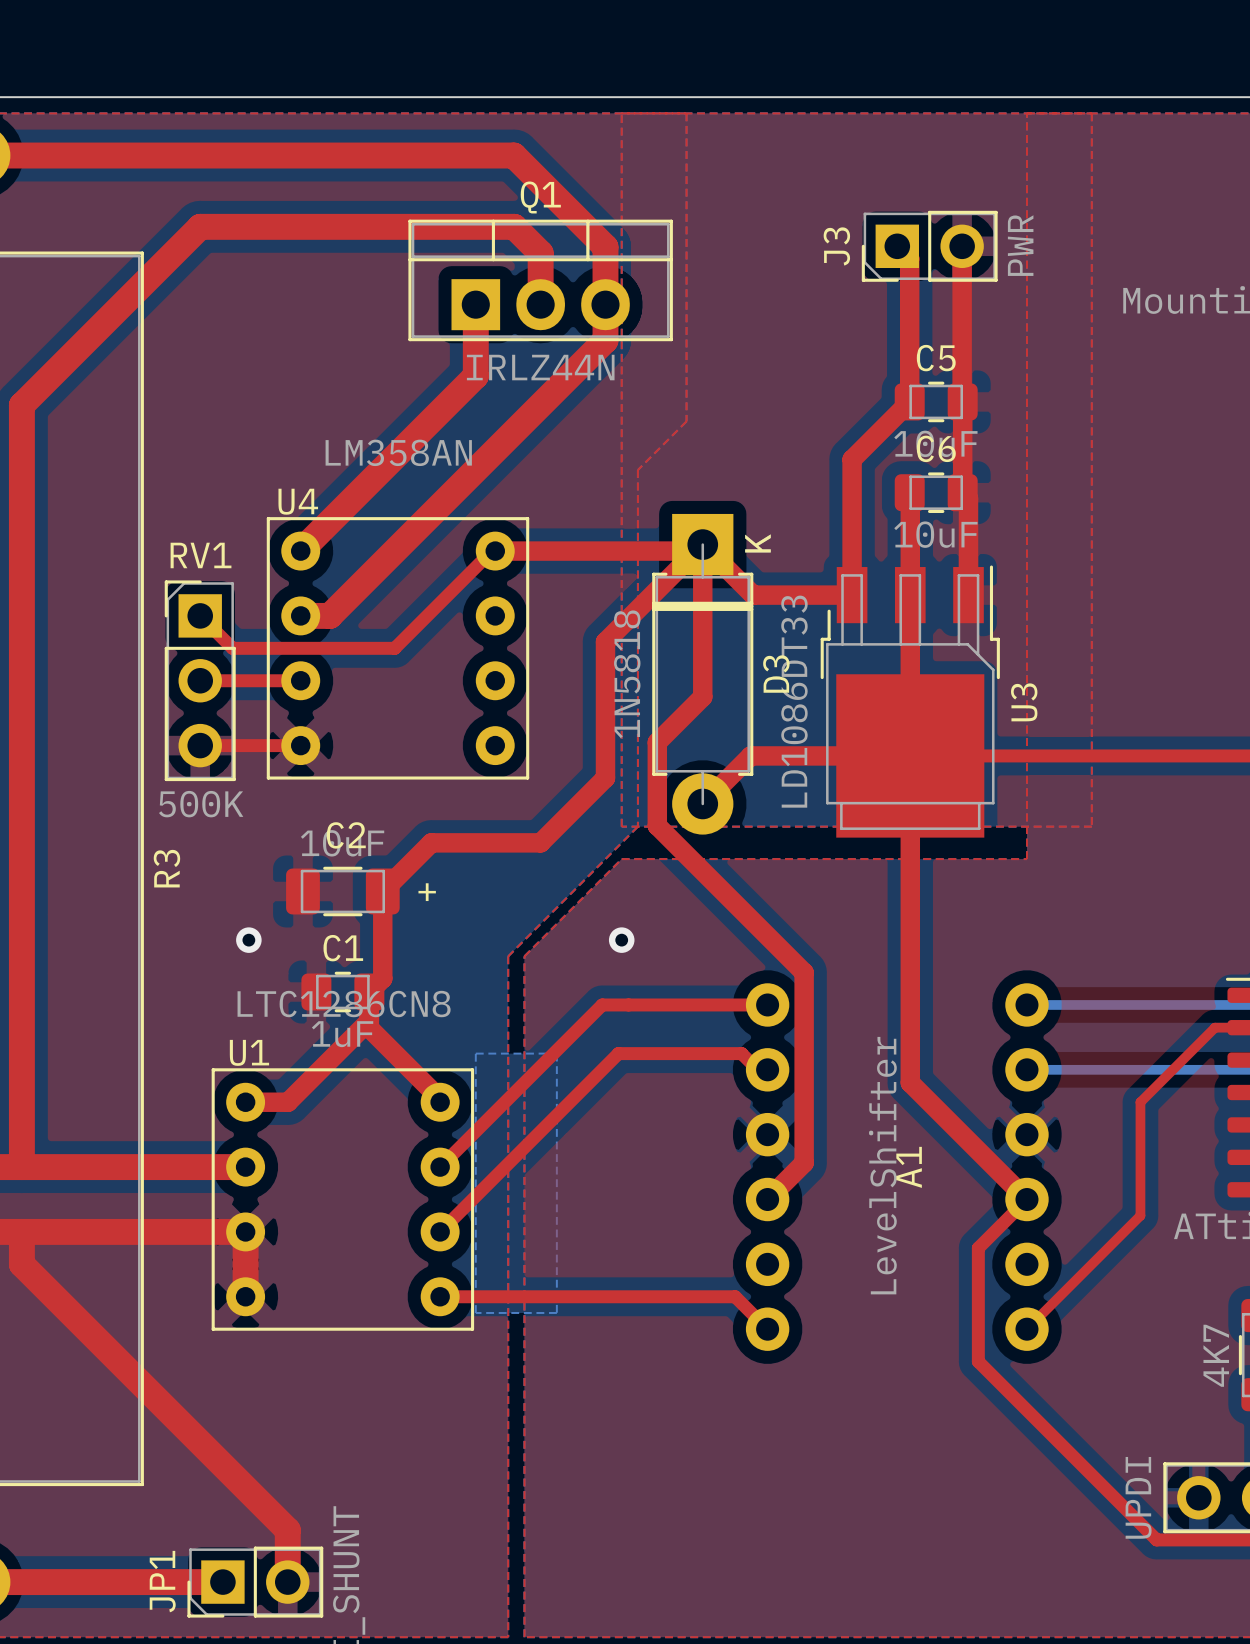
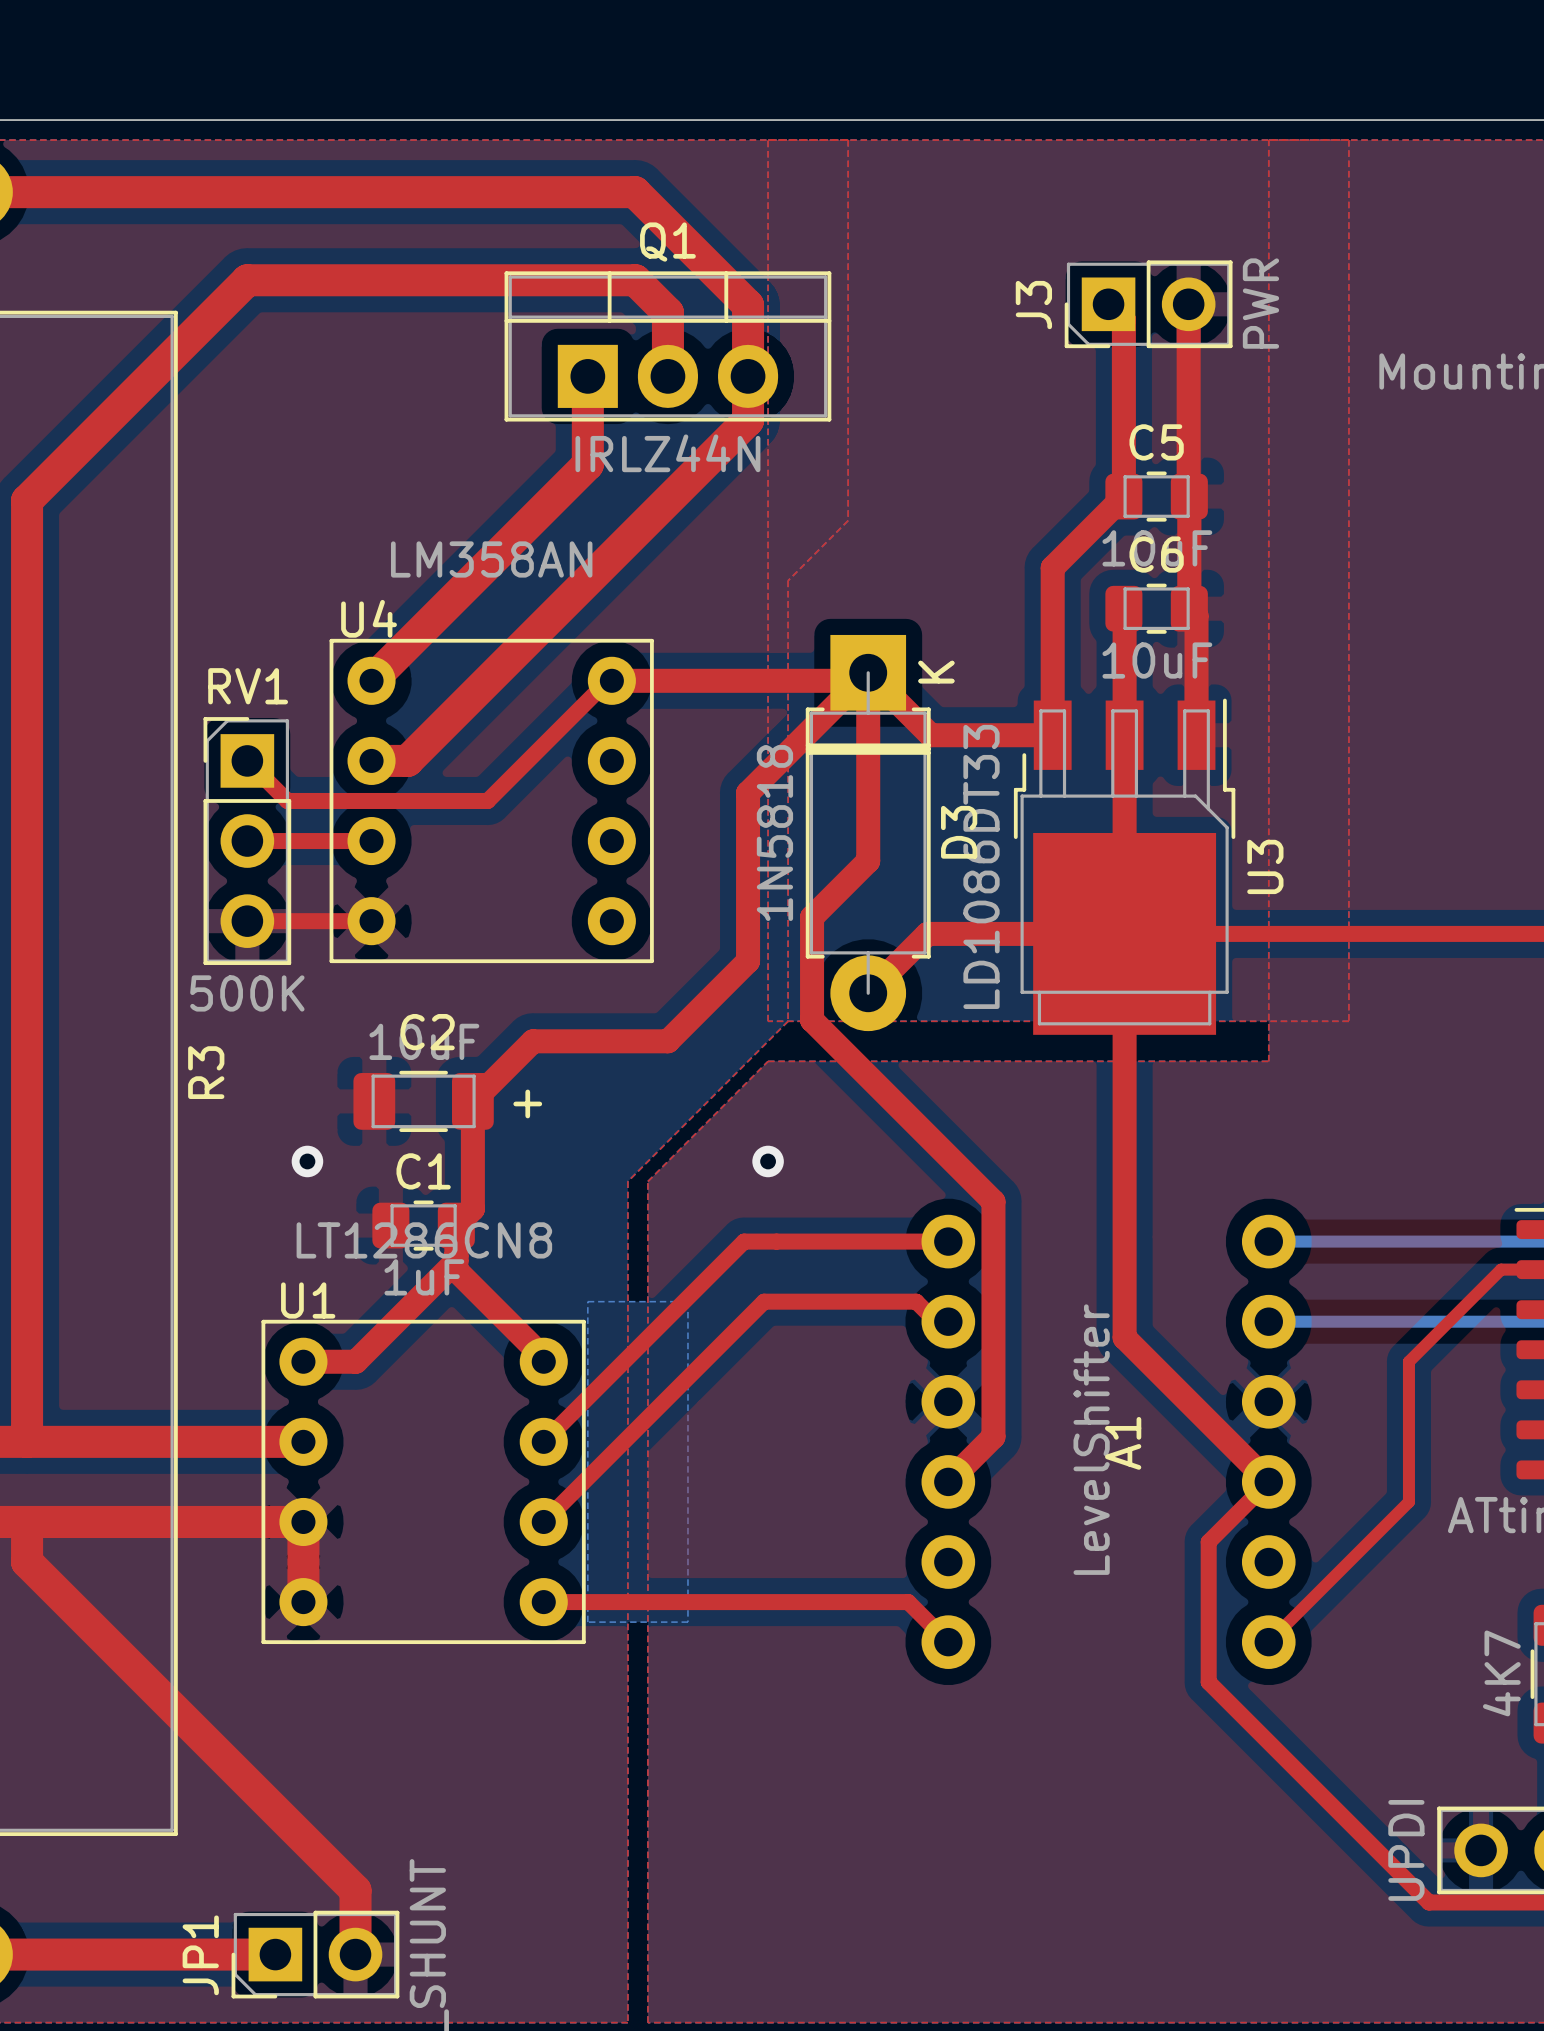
U1 value: LTC1286CN8 (344, 1004) -> LT1286CN8 (424, 1240)

